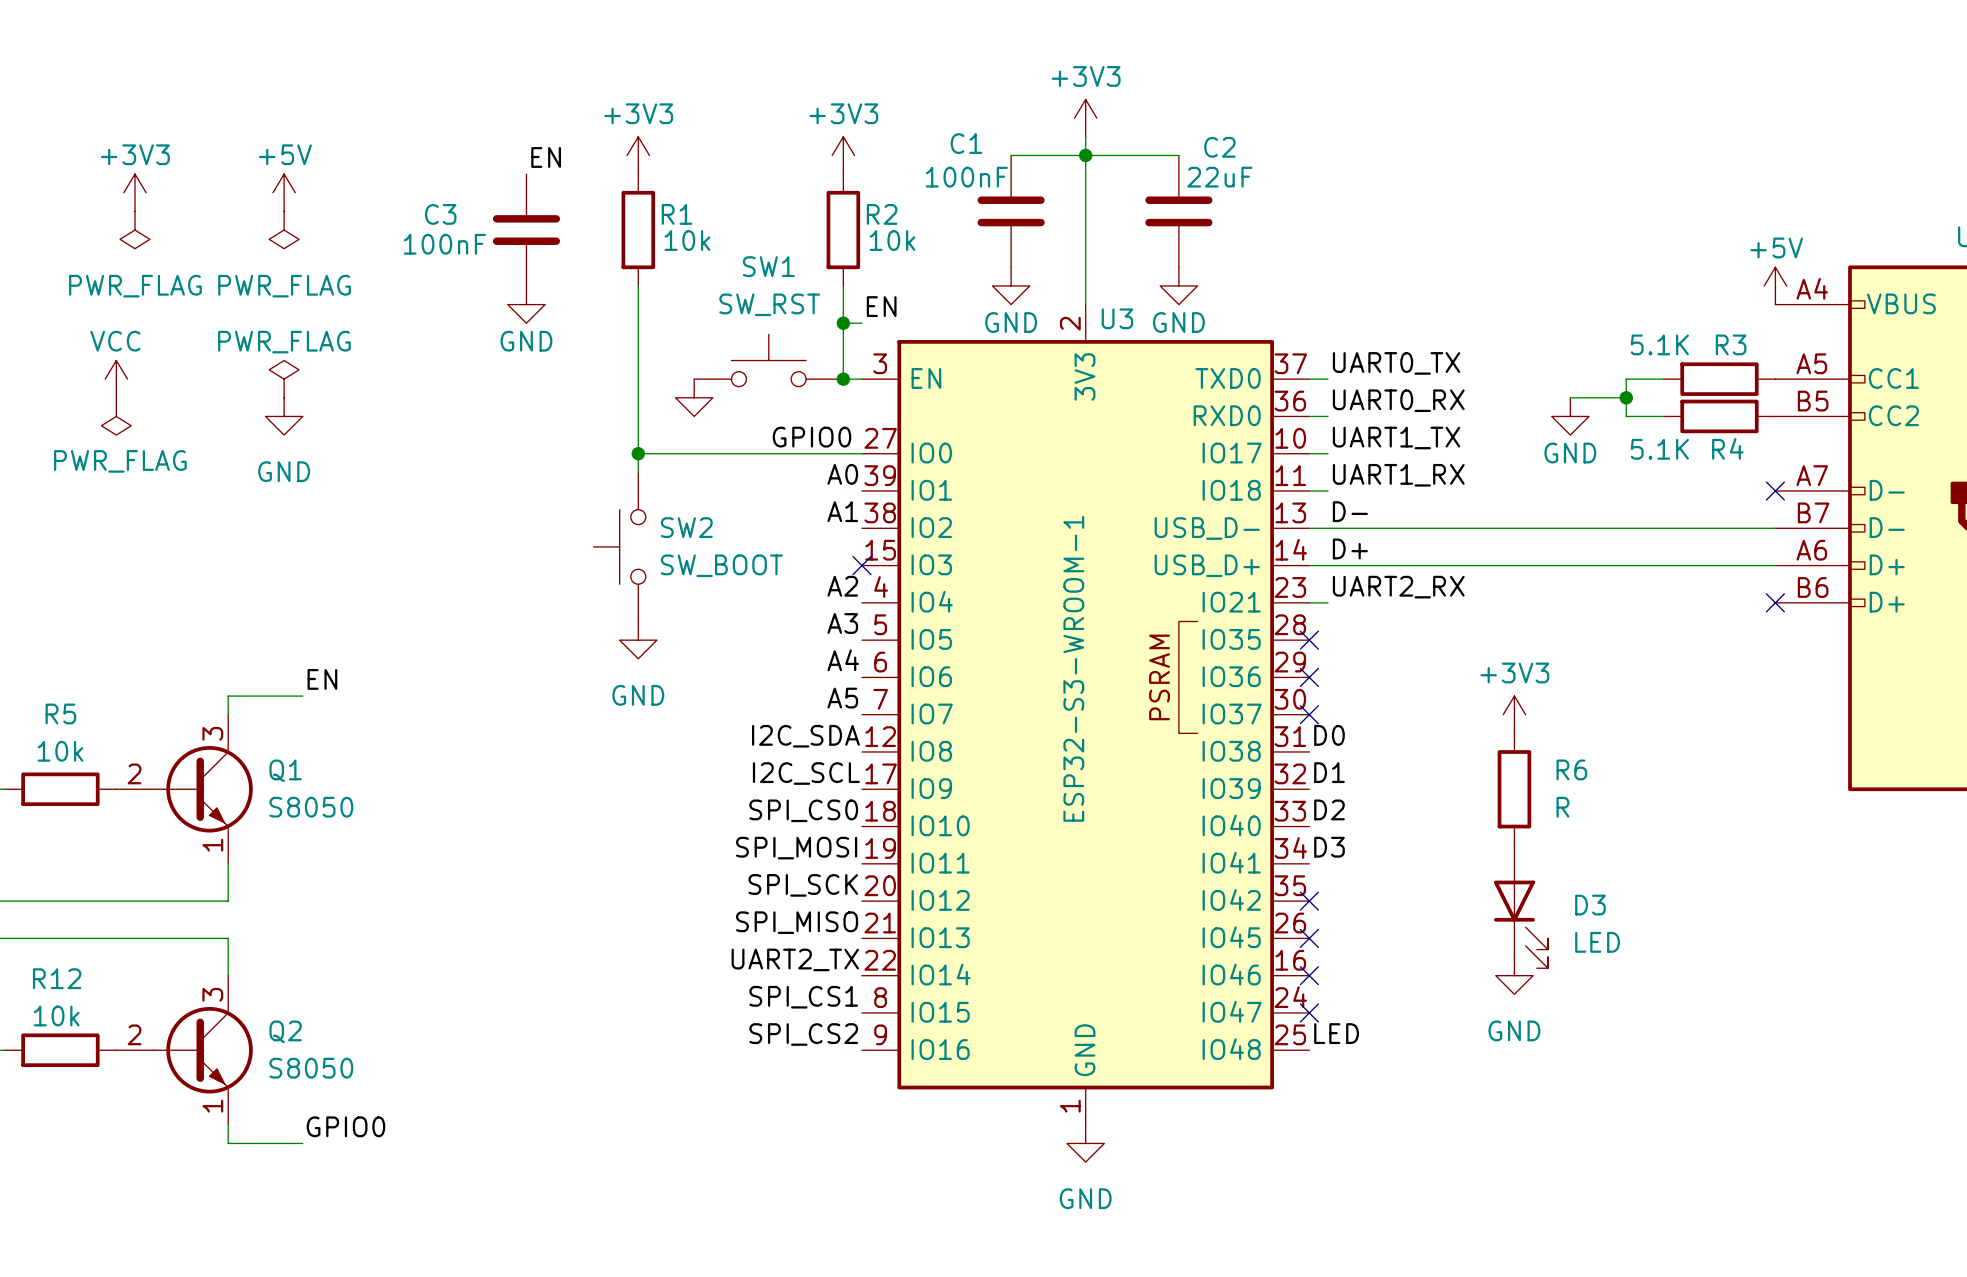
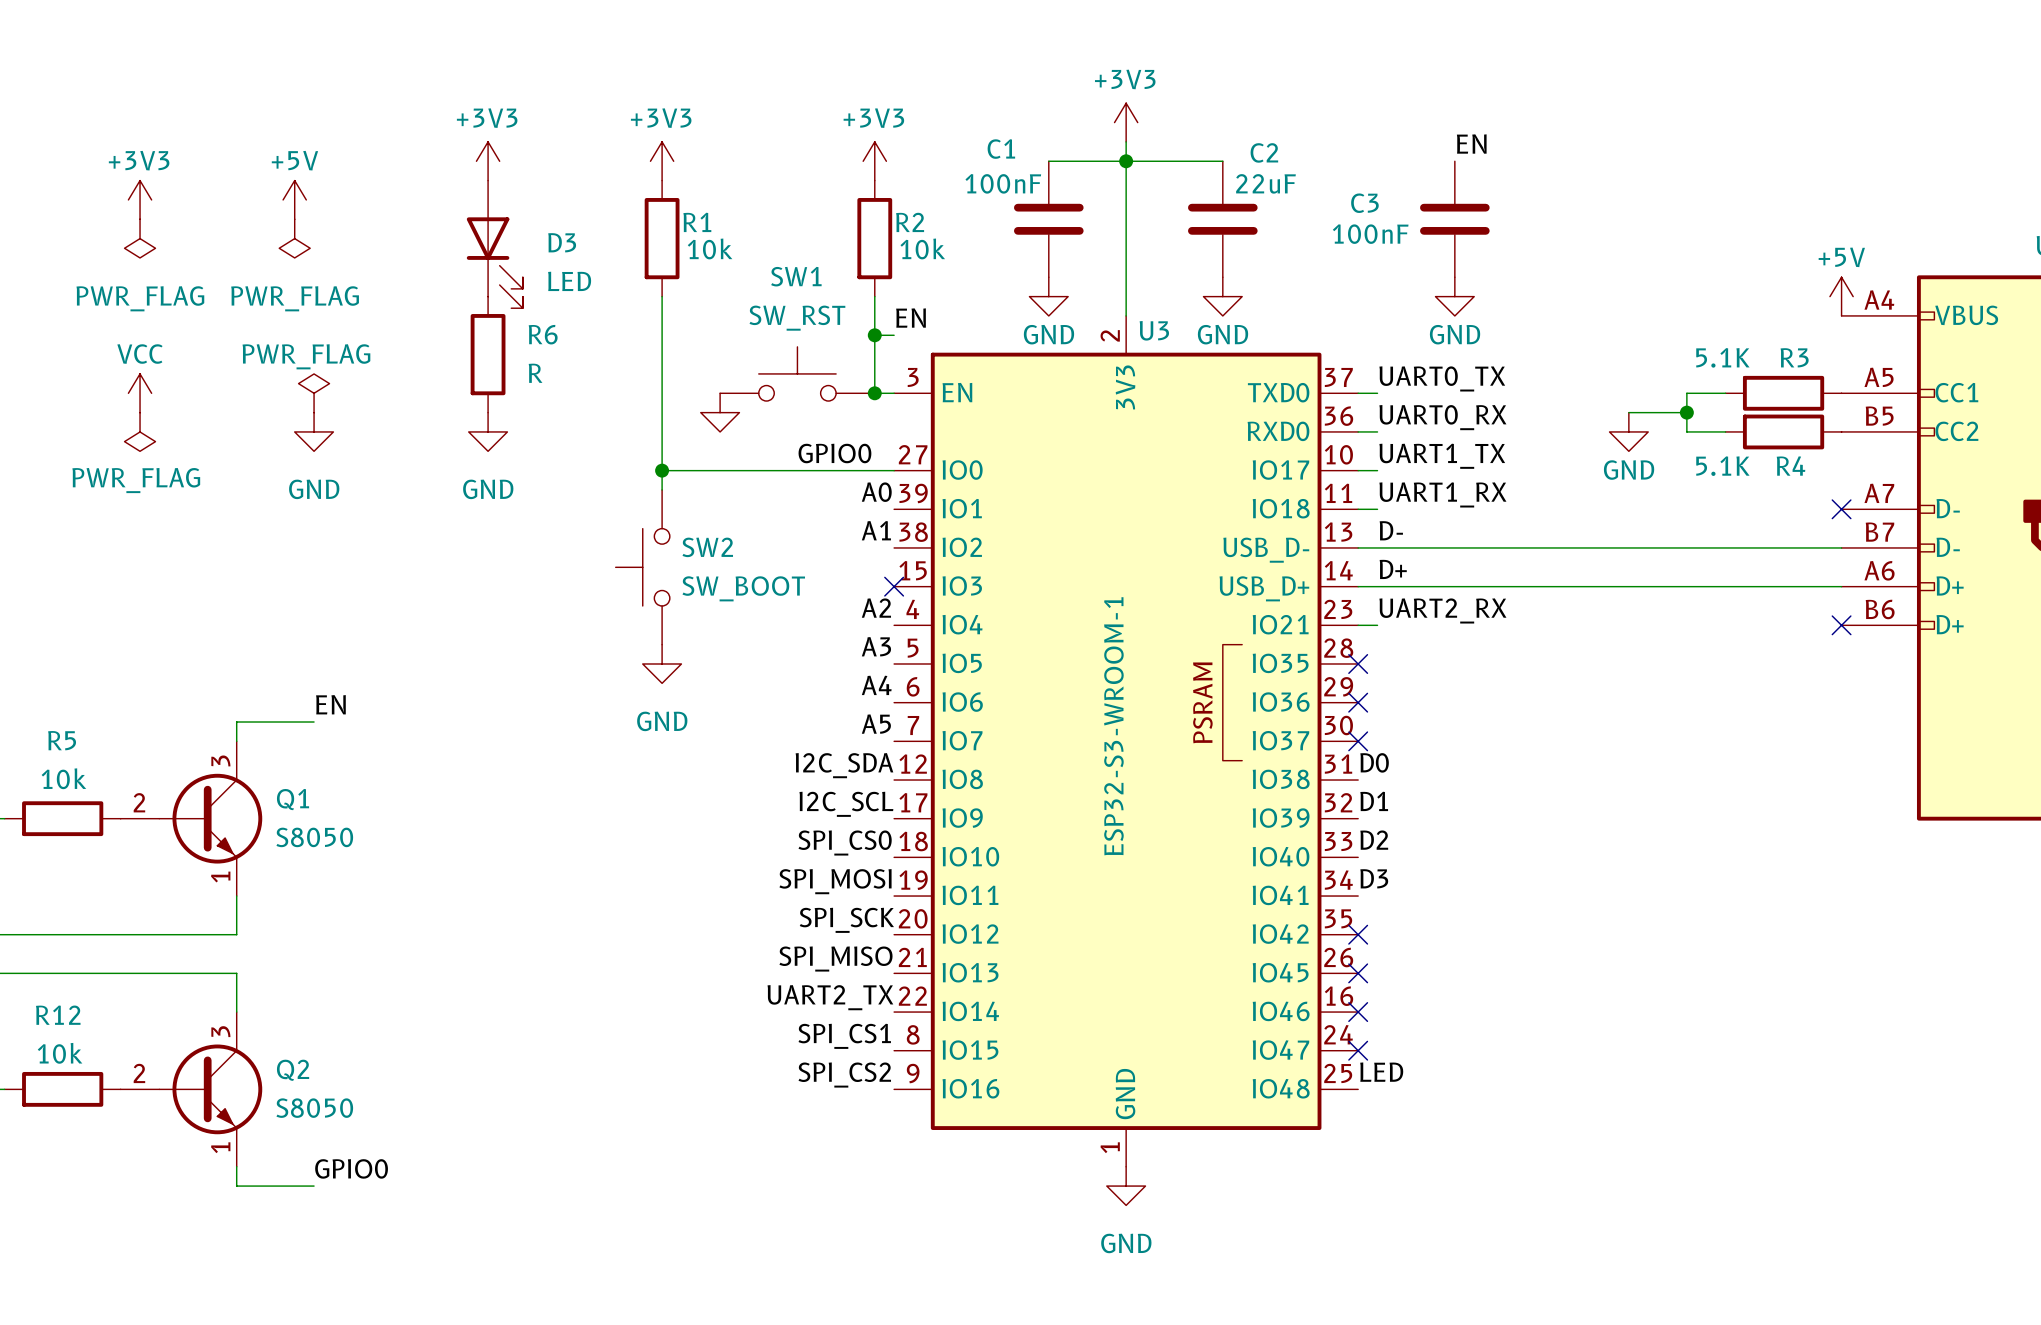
label: none -> EN (1471, 144)
power symbol: none -> +3V3 (488, 161)
label: EN (546, 157) -> none
C3 position: (526, 230) -> (1454, 219)
power symbol: none -> GND (1454, 296)
power symbol: GND (526, 304) -> none
power symbol position: VCC (116, 379) -> VCC (140, 393)
power symbol position: PWR_FLAG (284, 379) -> PWR_FLAG (314, 393)
power symbol position: PWR_FLAG (116, 416) -> PWR_FLAG (140, 431)
power symbol position: GND (284, 416) -> GND (314, 431)
power symbol: none -> GND (488, 431)
power symbol: +3V3 (1514, 714) -> none
R6 position: (1514, 789) -> (488, 354)
D3 position: (1520, 906) -> (494, 244)
power symbol: GND (1514, 975) -> none

